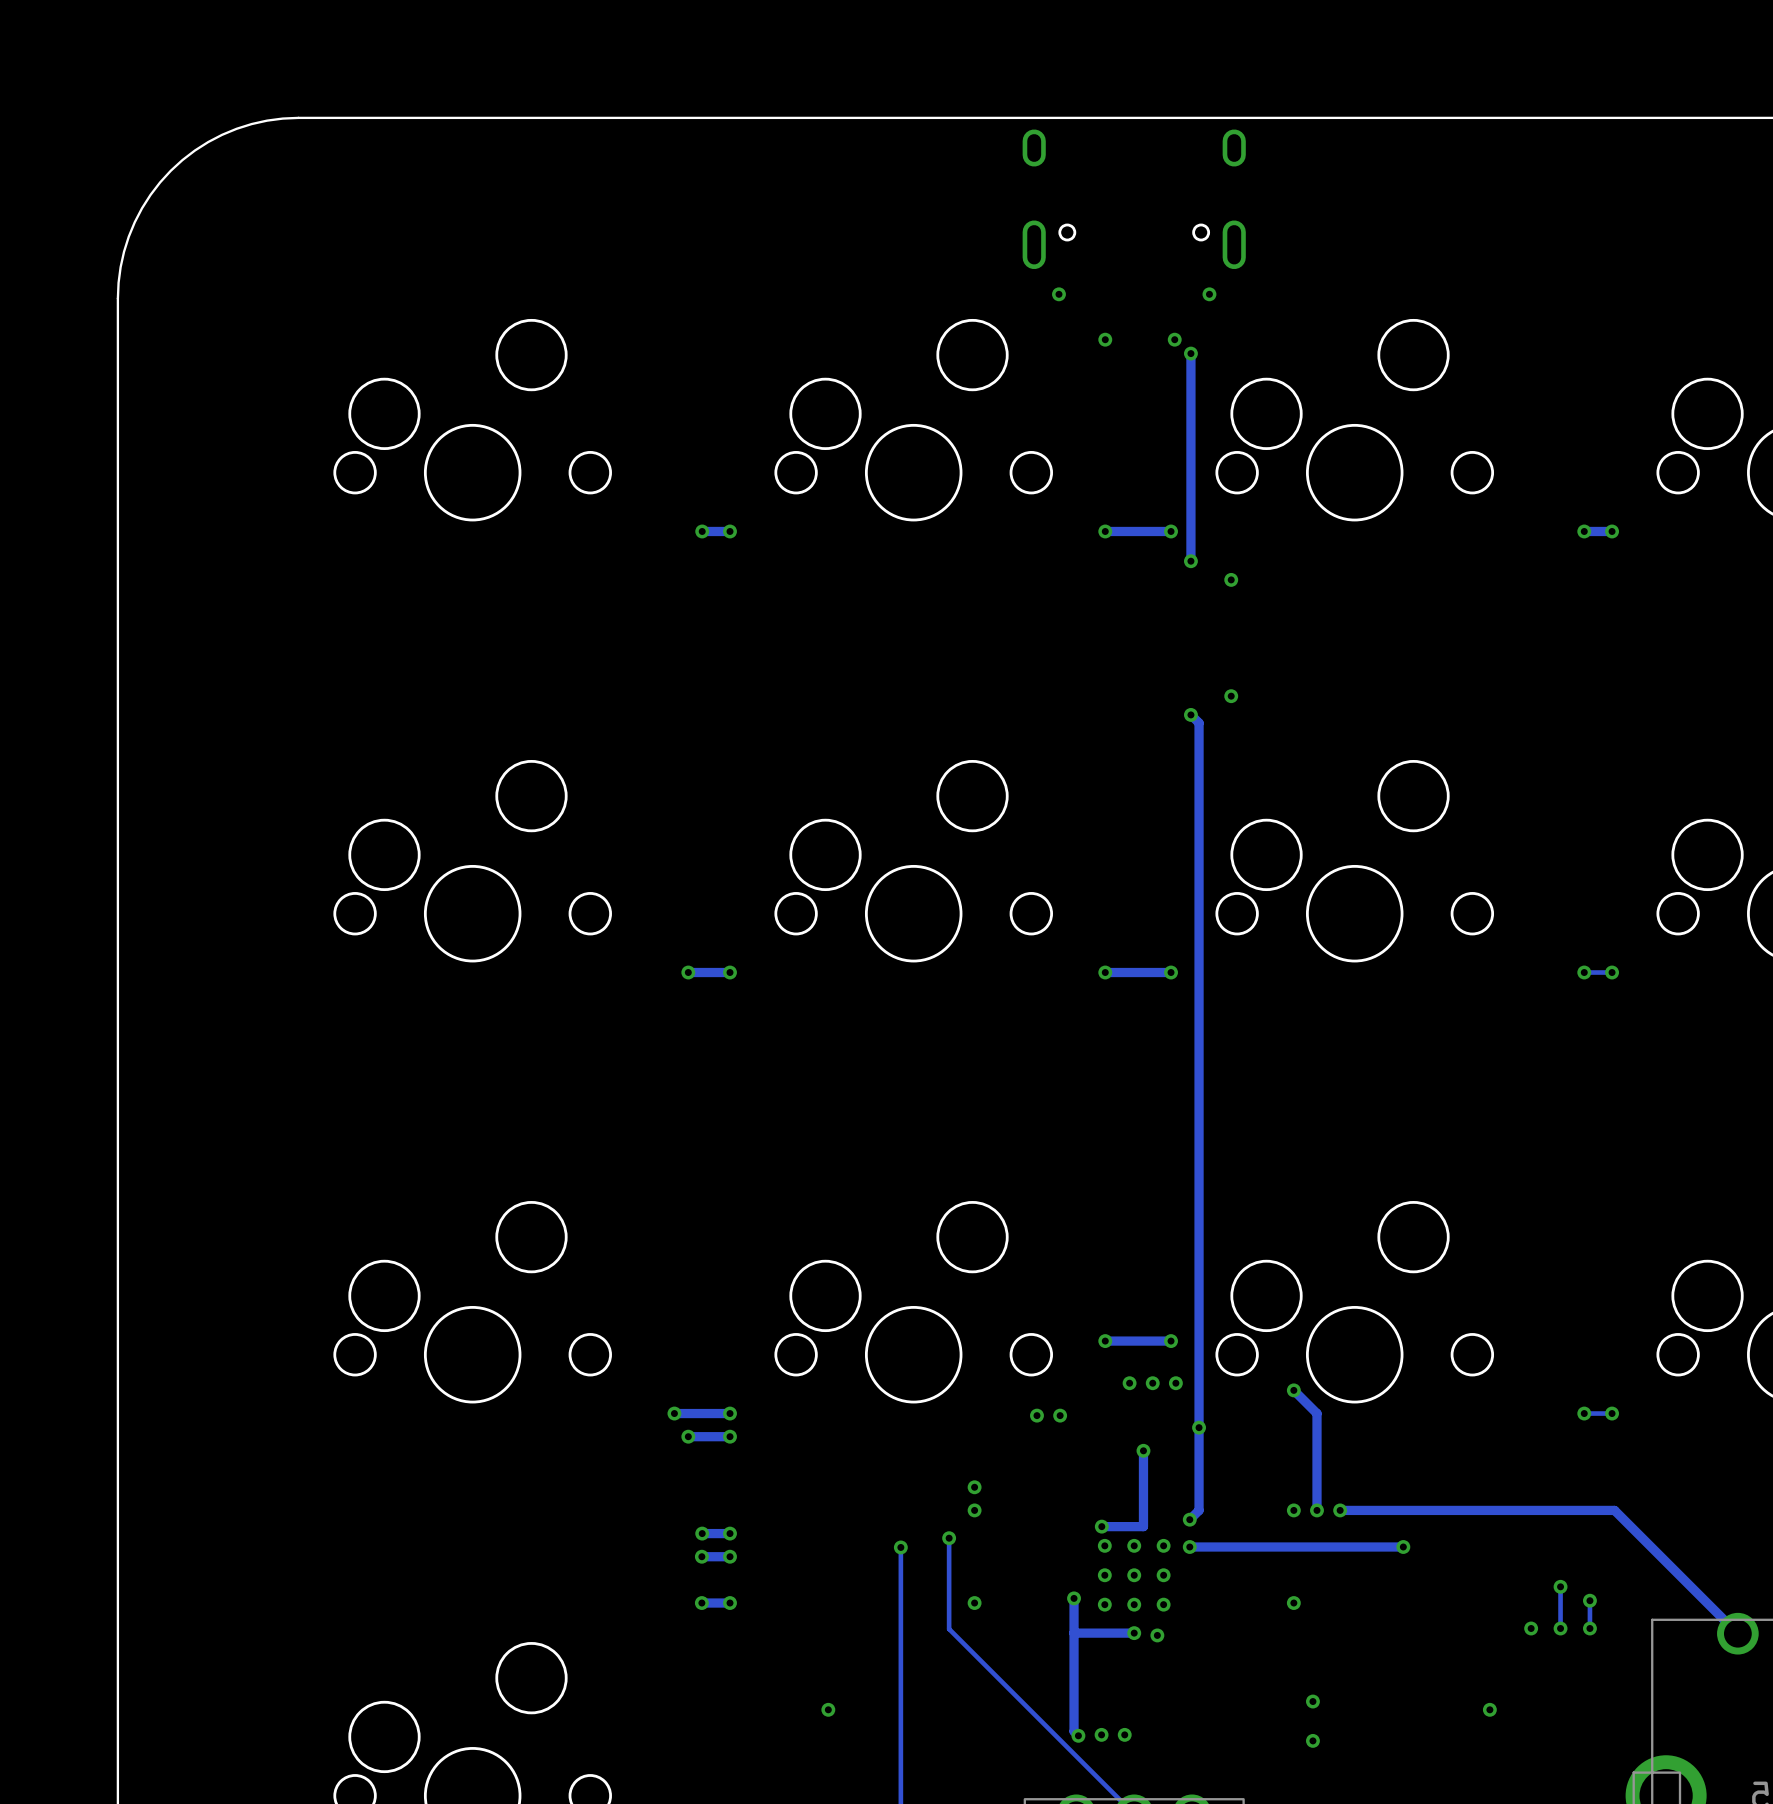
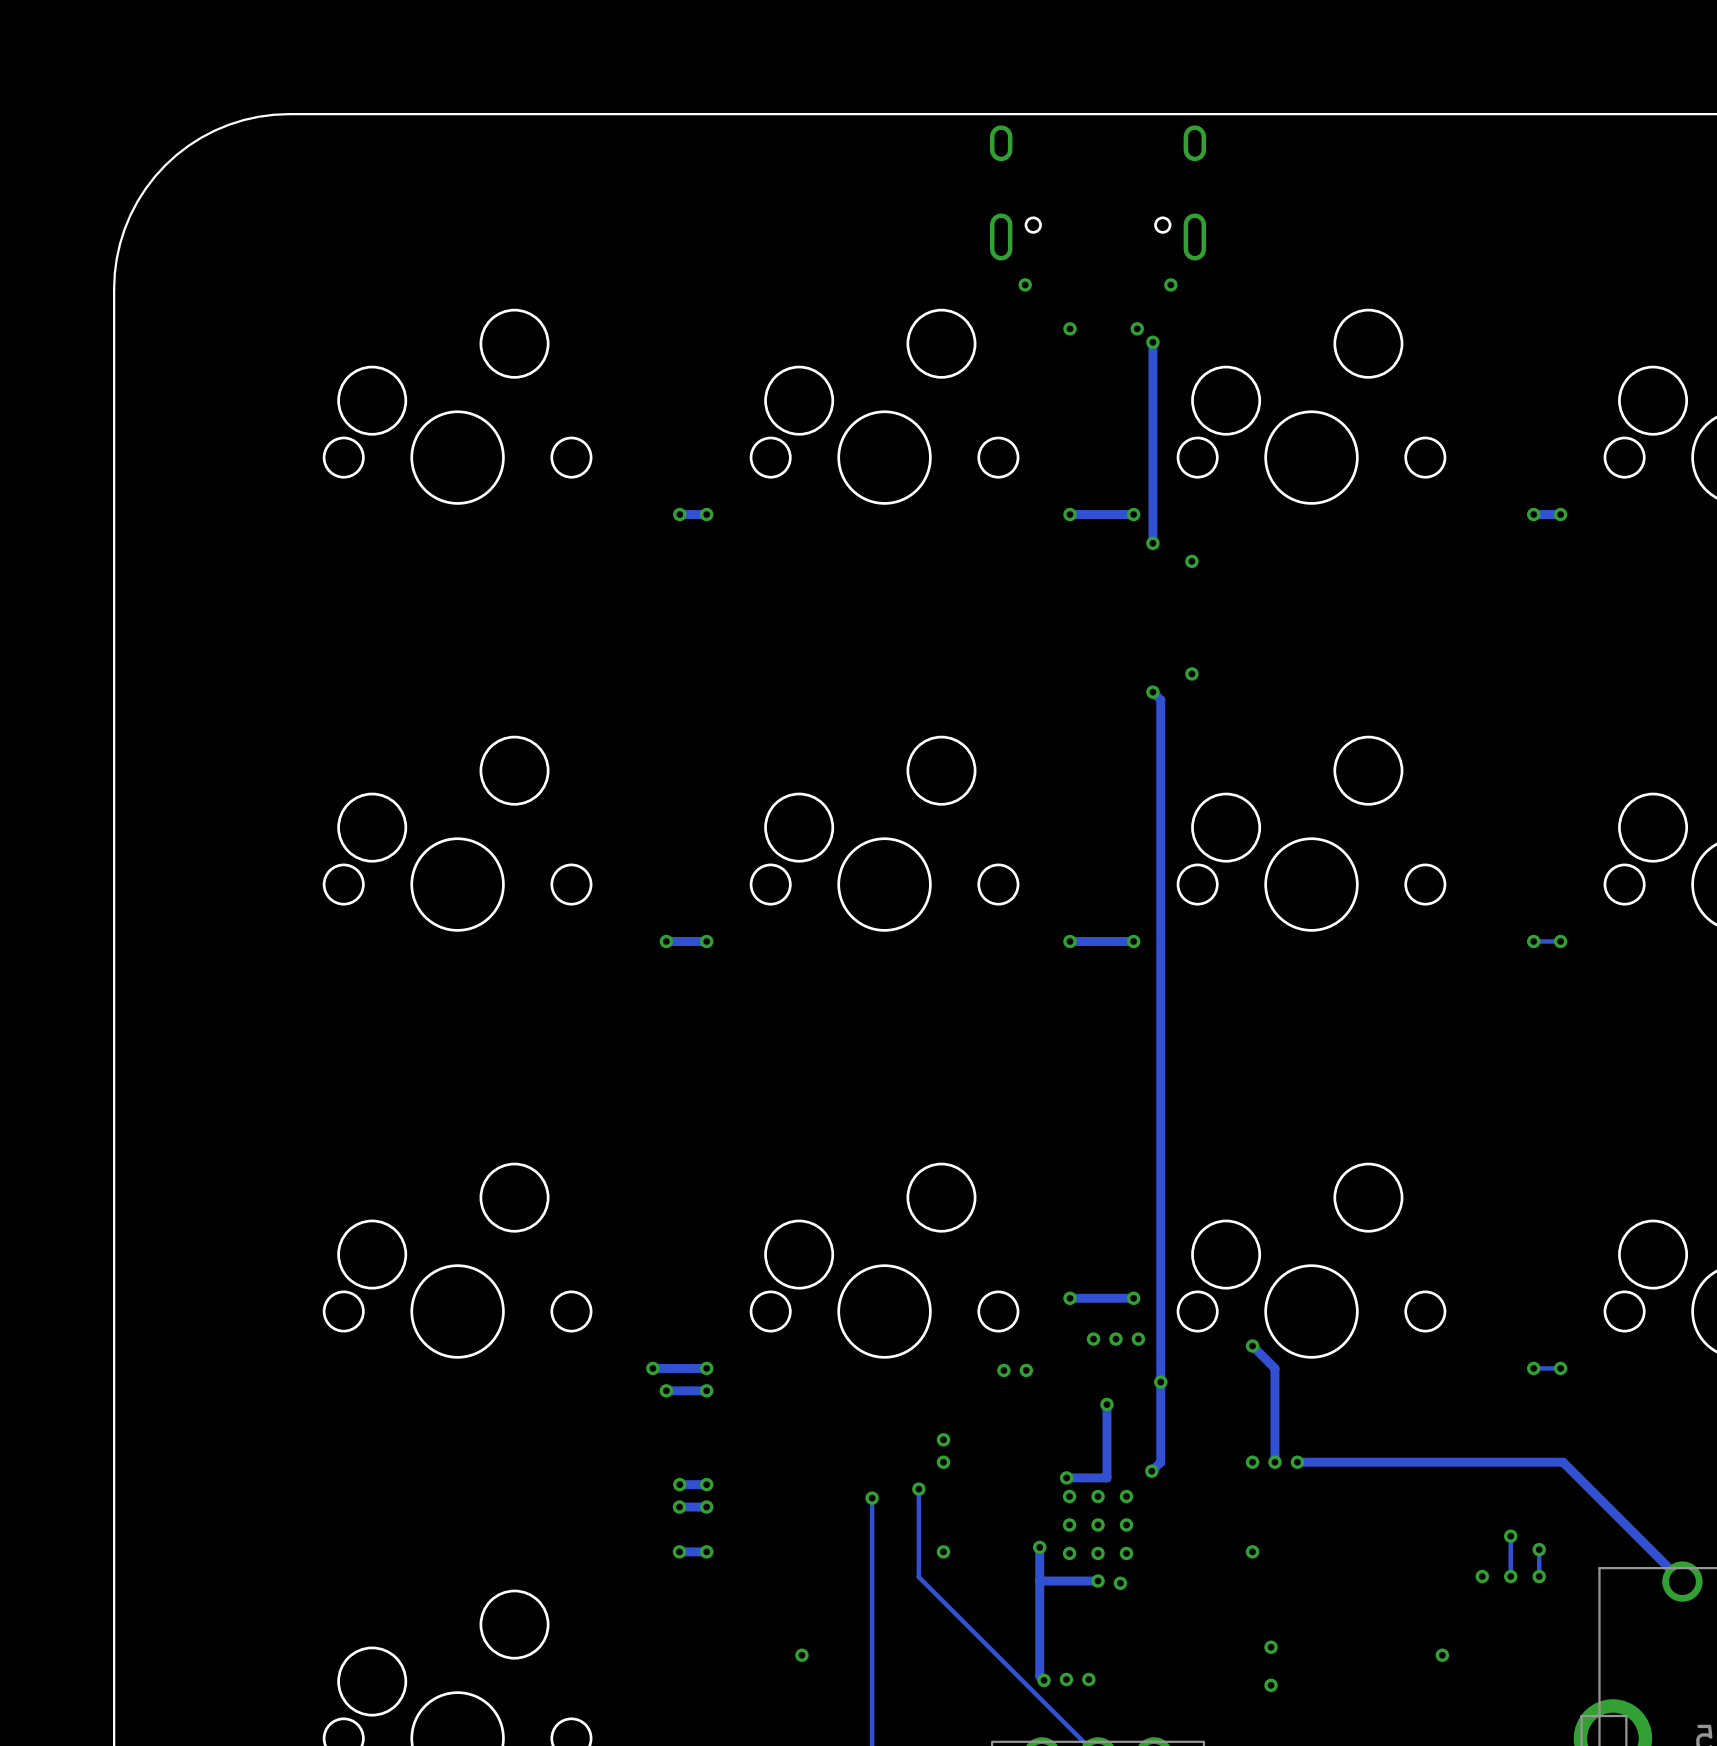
via: (1189, 1547) -> none
track: (1403, 1547) (1189, 1547) -> none
via: (1403, 1547) -> none

